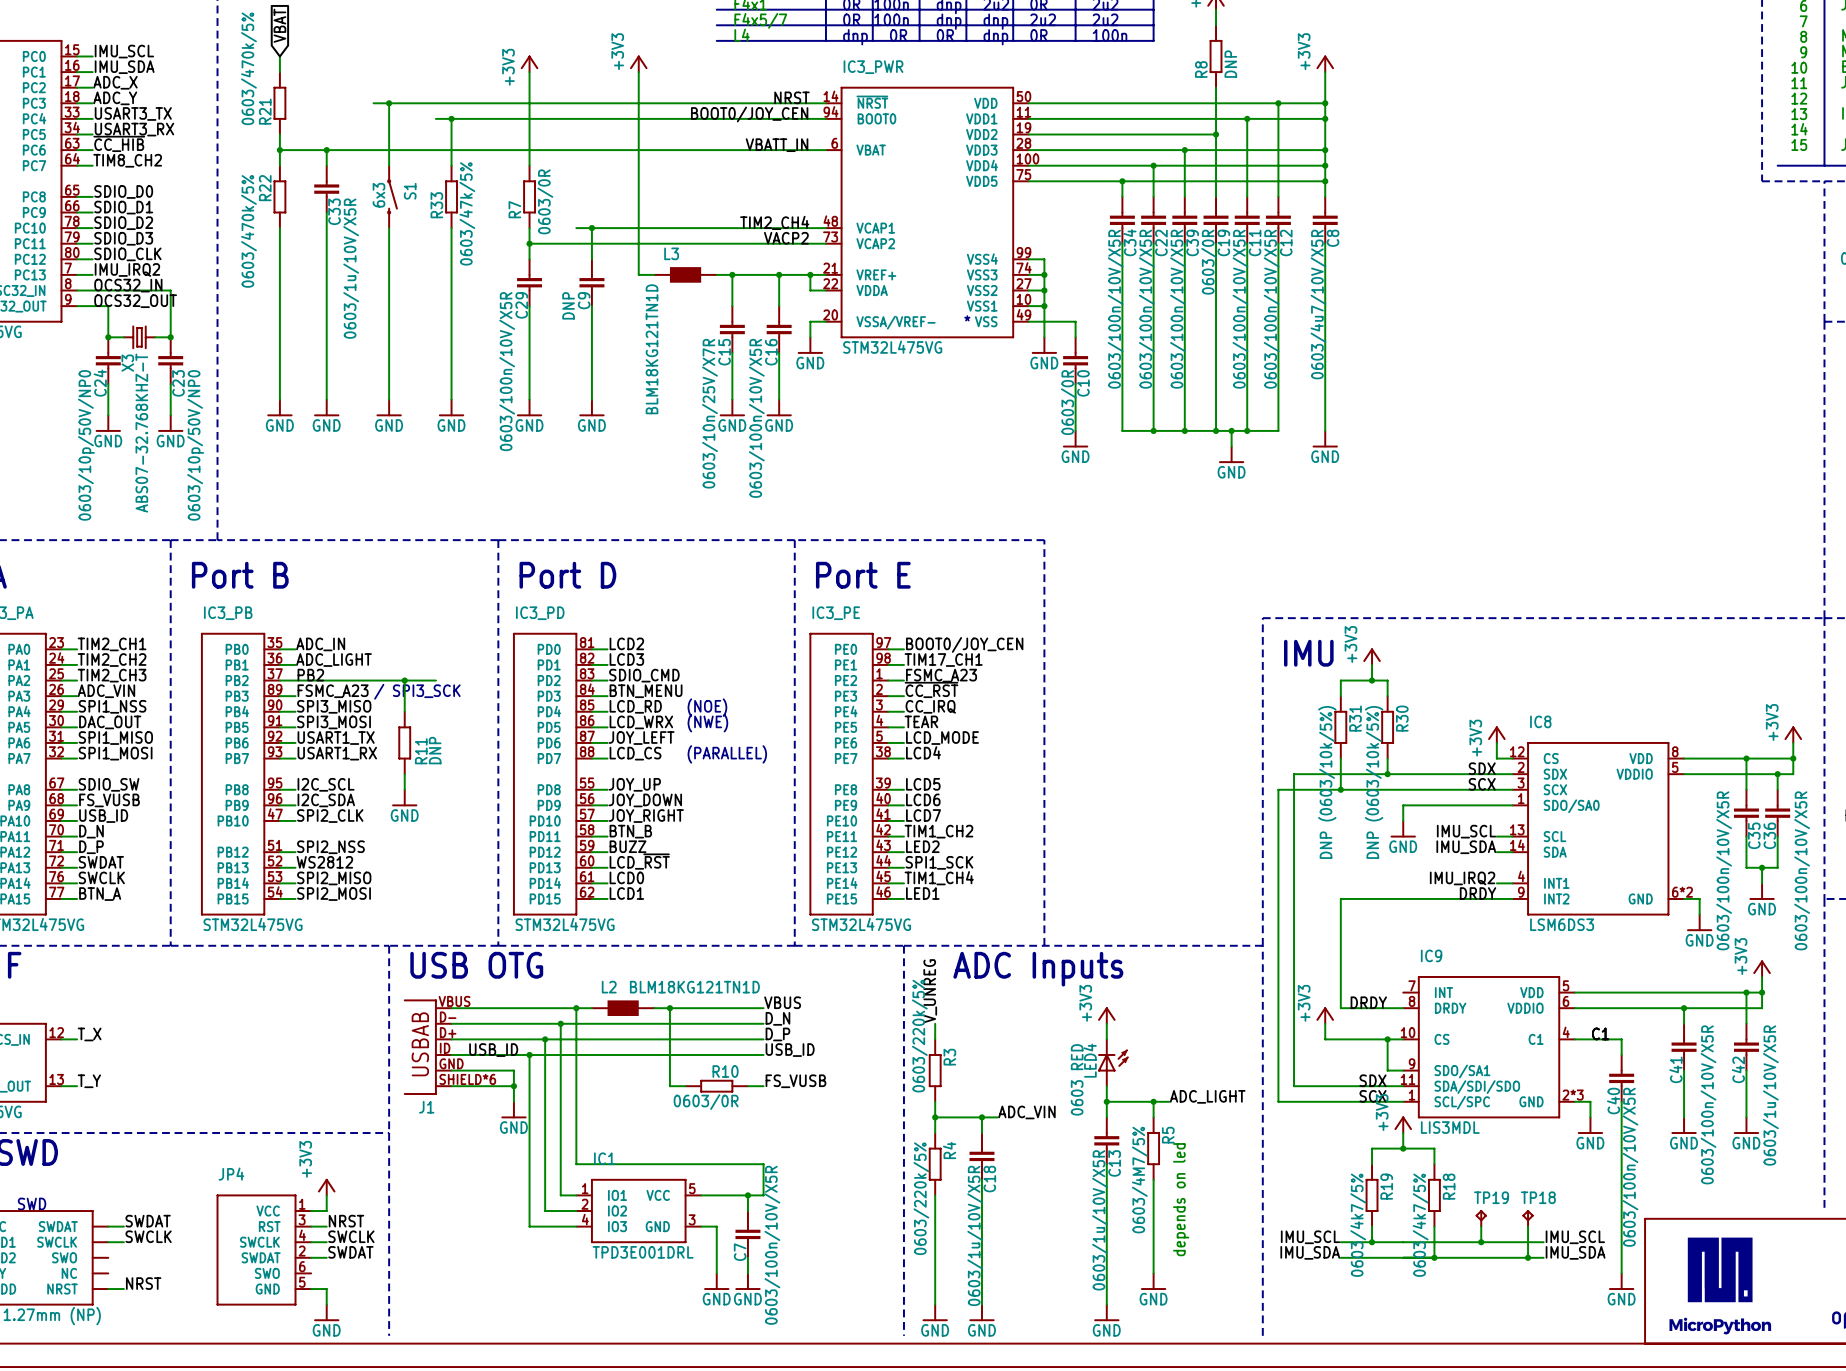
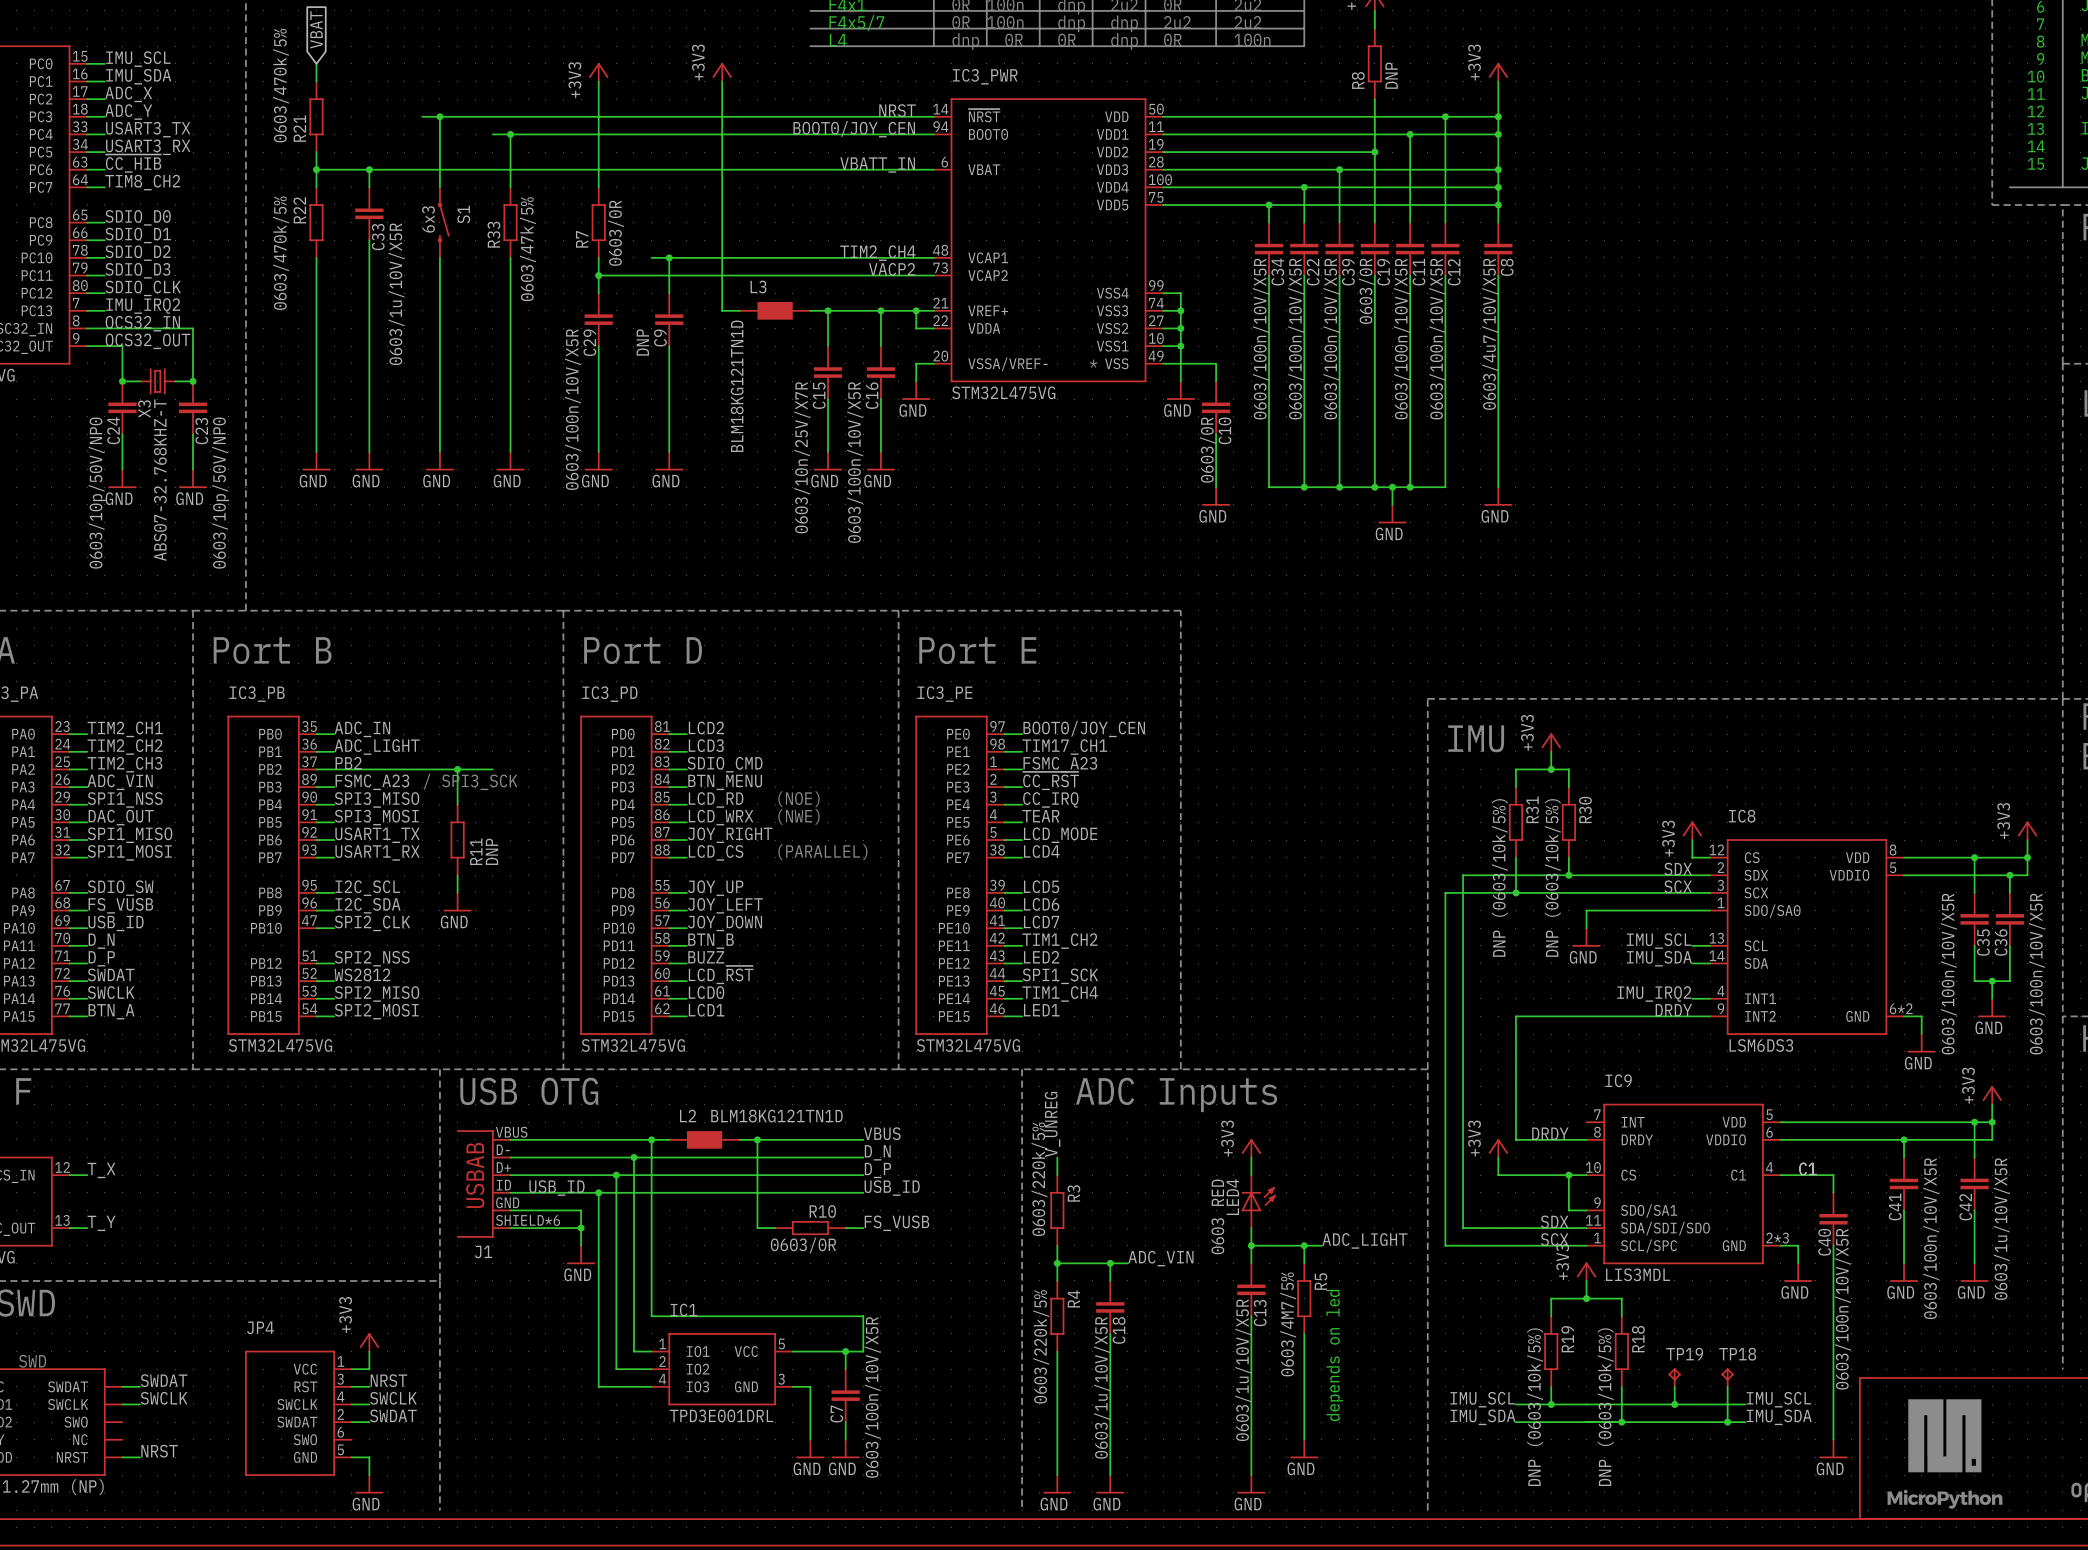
label: JOY_LEFT (641, 738) -> JOY_RIGHT (730, 835)
label: JOY_DOWN (645, 800) -> JOY_LEFT (725, 905)
label: JOY_RIGHT (646, 816) -> JOY_DOWN (725, 923)
R19 value: 0603/4k7/5% (1358, 1225) -> DNP (0603/10k/5%) (1535, 1407)
R18 value: 0603/4k7/5% (1420, 1225) -> DNP (0603/10k/5%) (1605, 1407)

